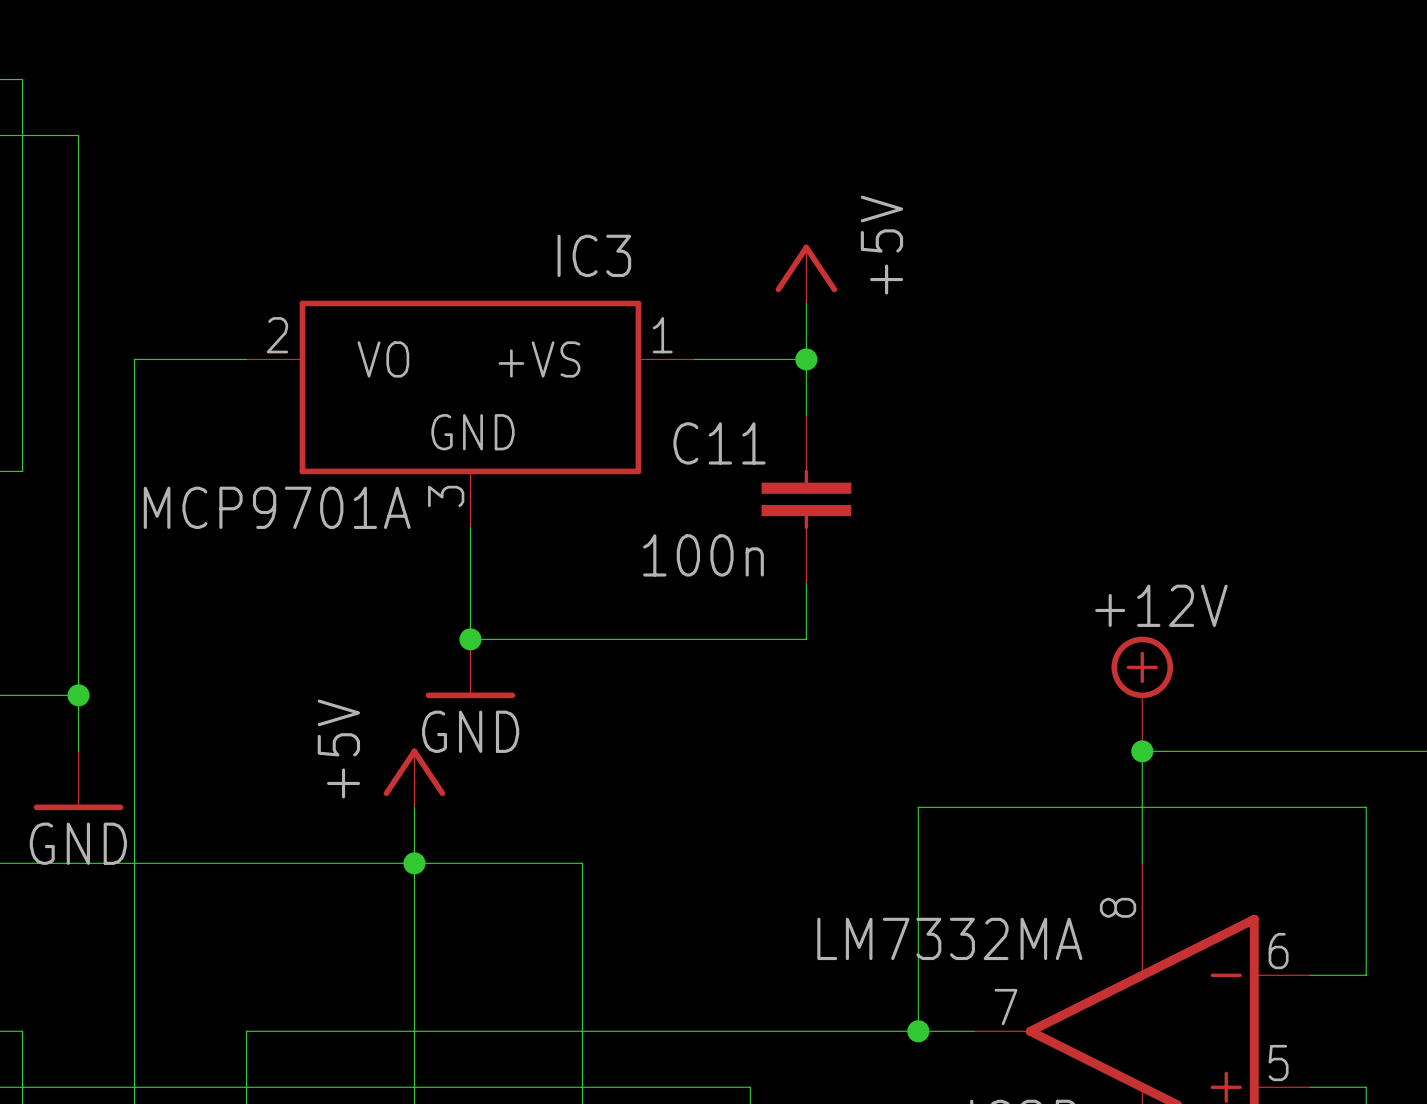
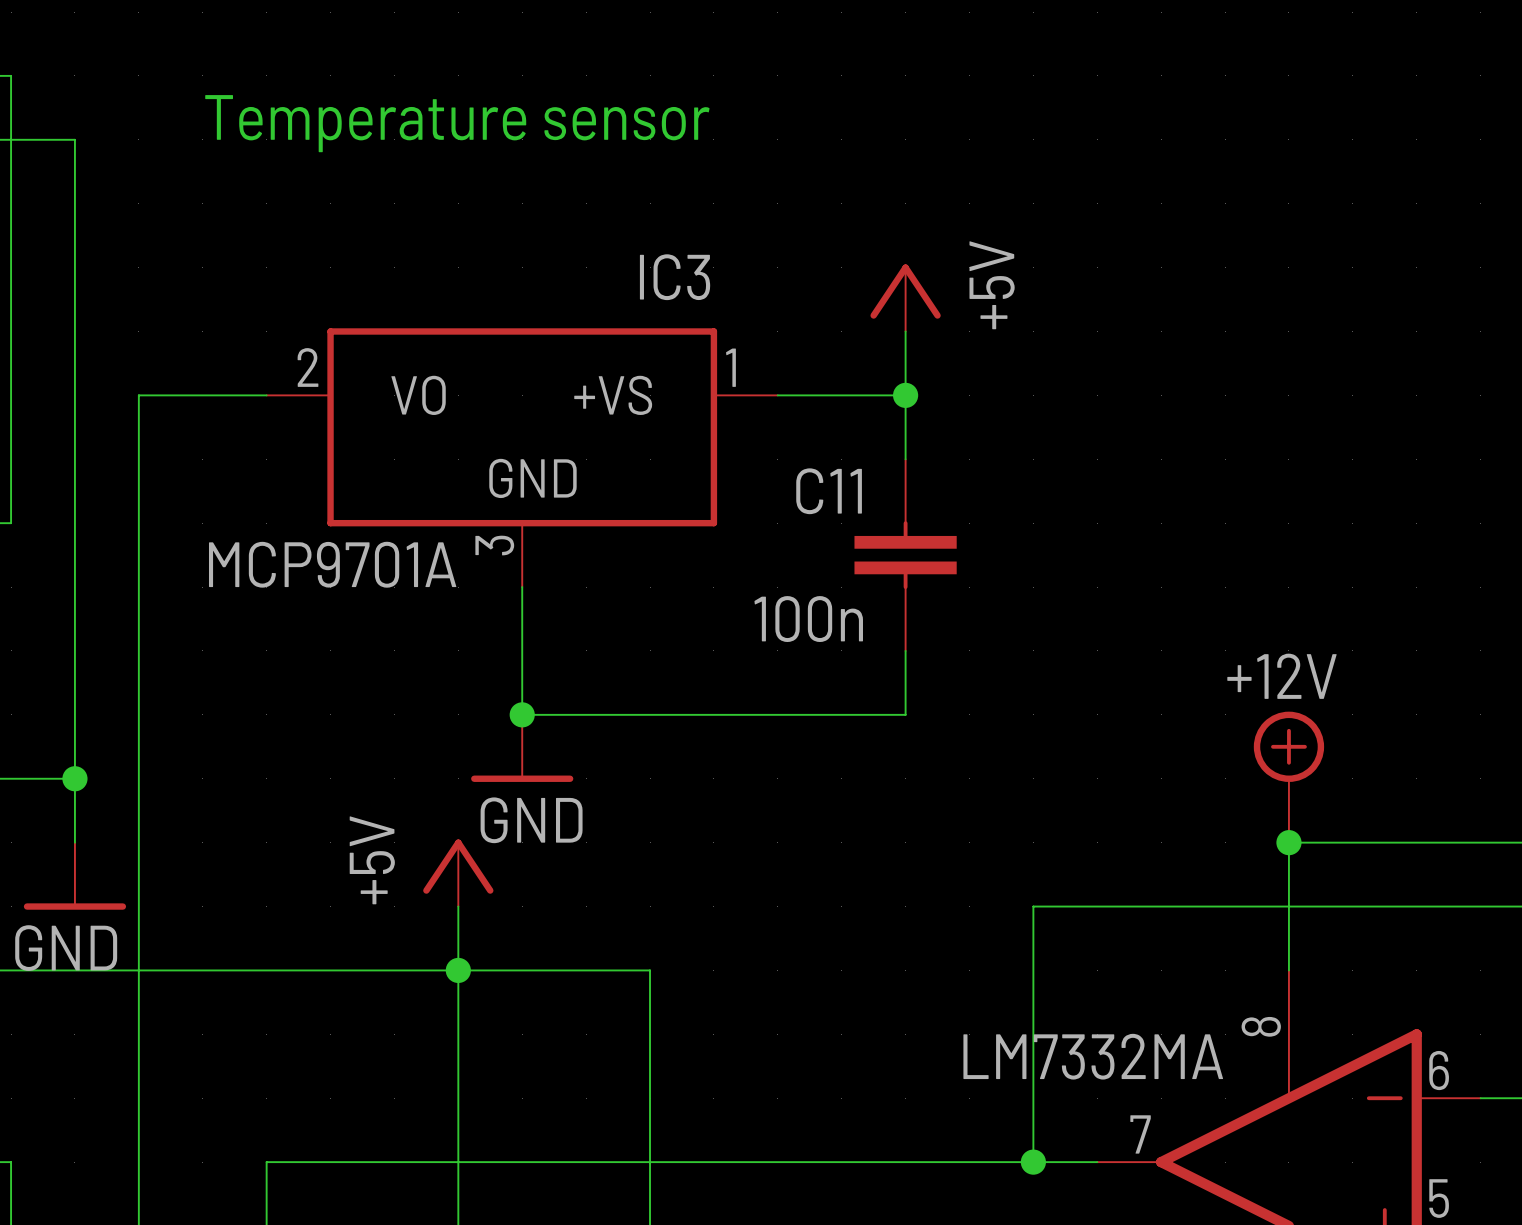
text: none -> Temperature sensor (457, 123)

